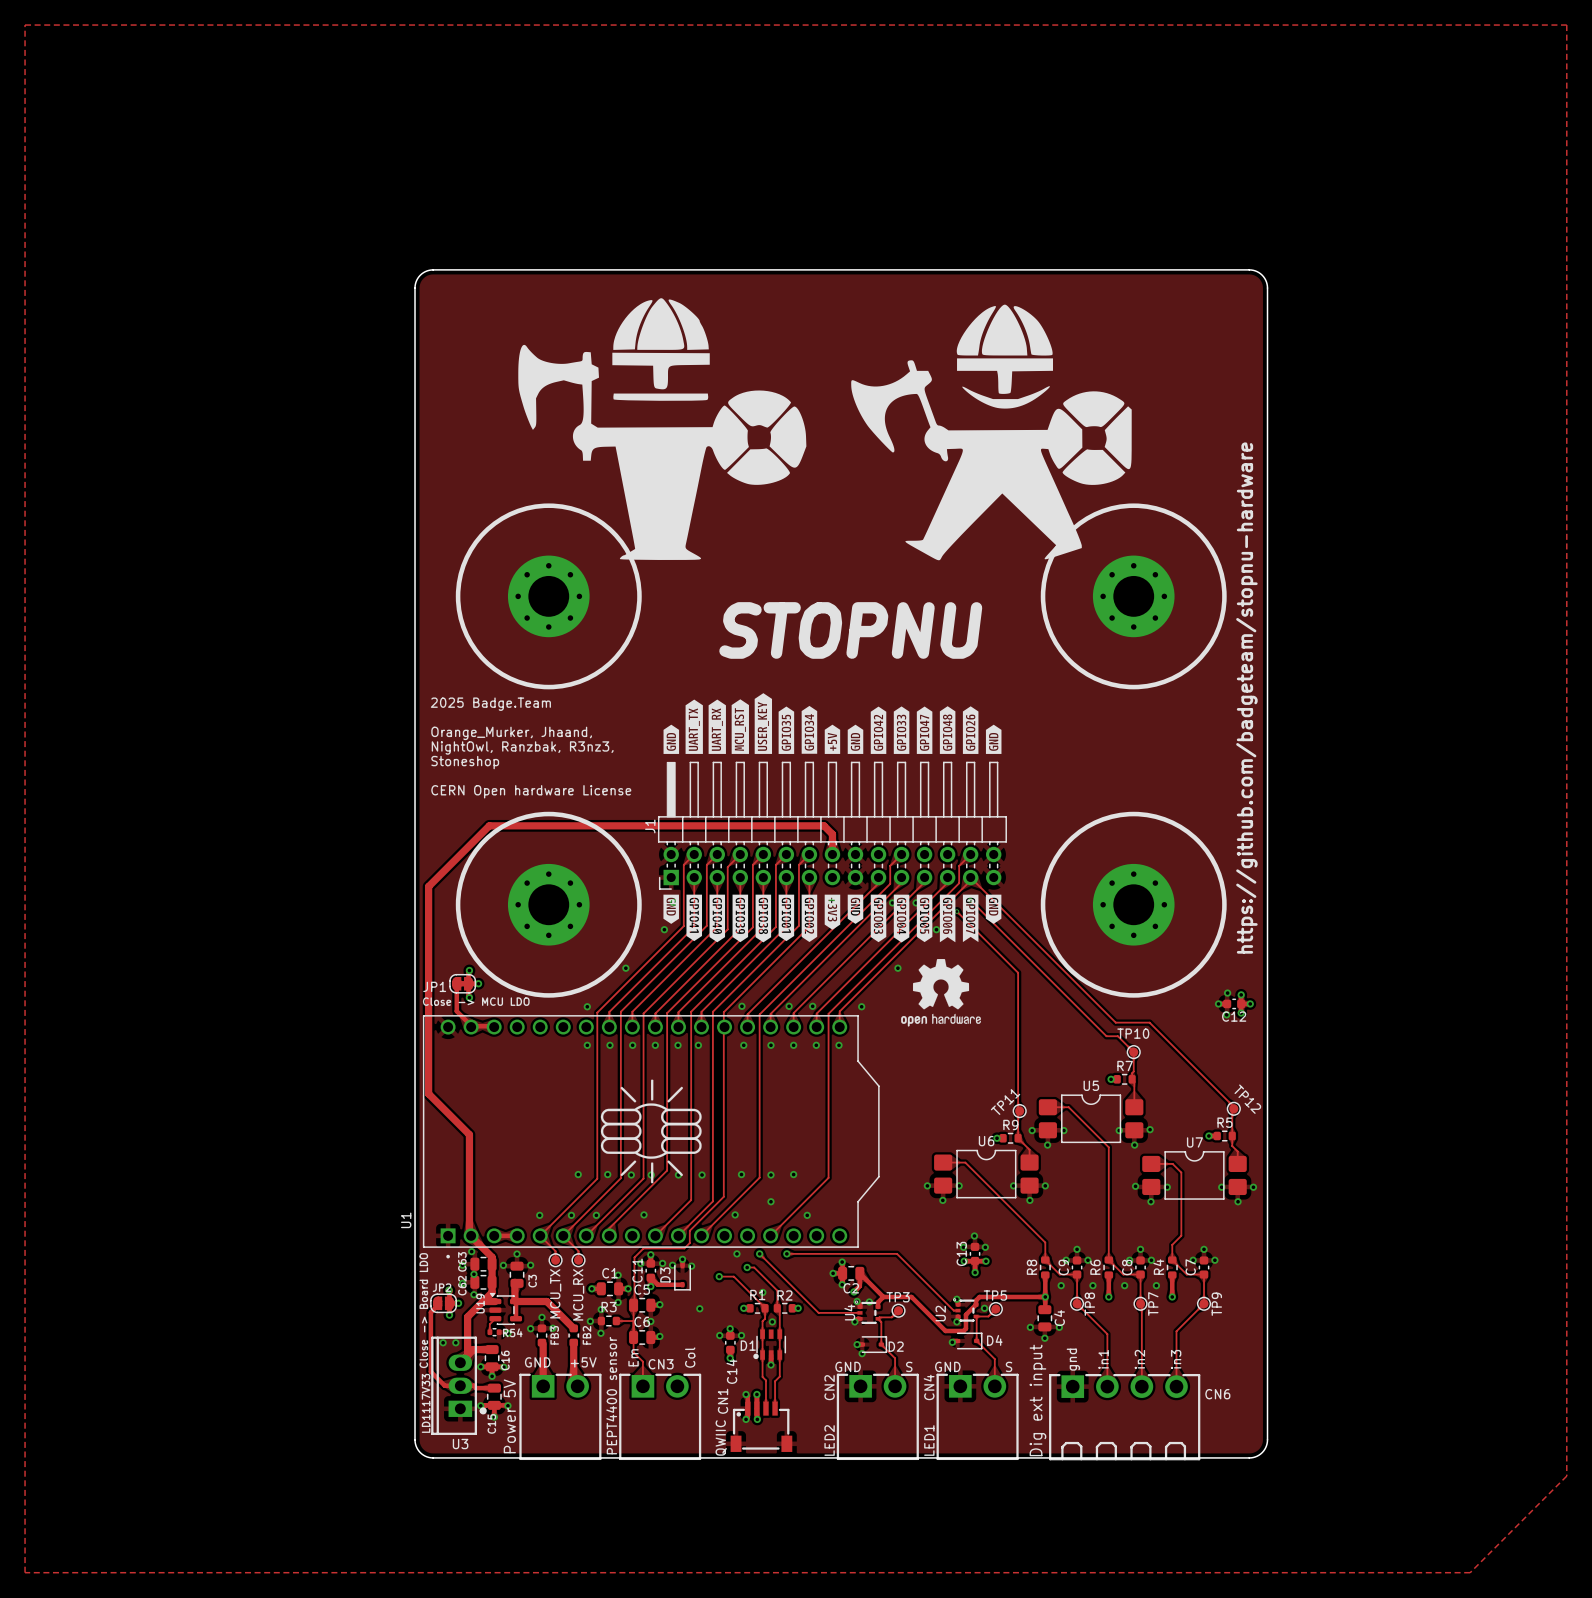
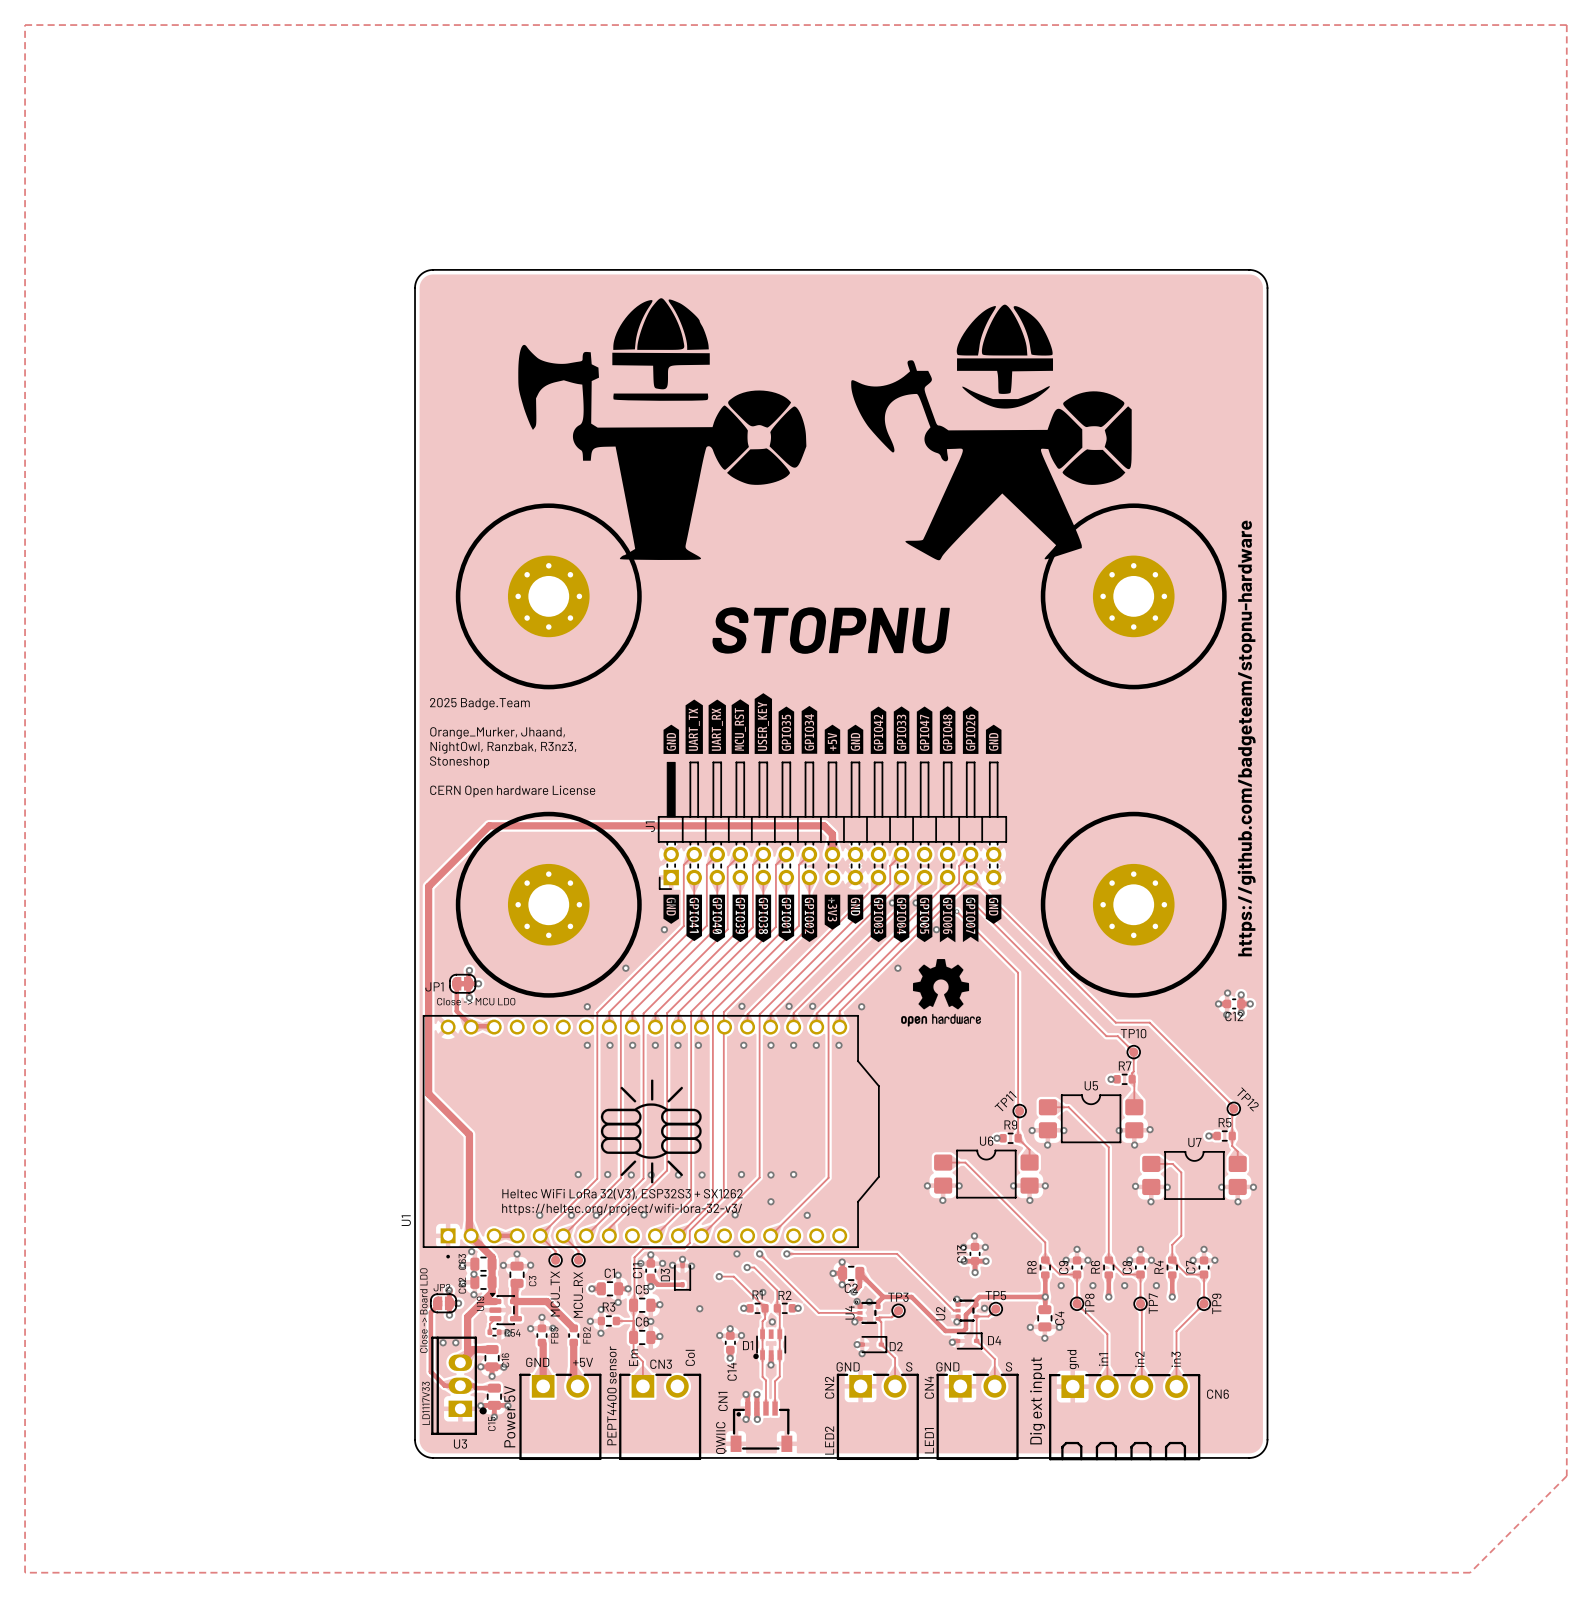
text: none -> Heltec WiFi LoRa 32(V3), ESP32S3 + SX1262 (622, 1194)
text: none -> https://heltec.org/project/wifi-lora-32-v3/ (622, 1209)

